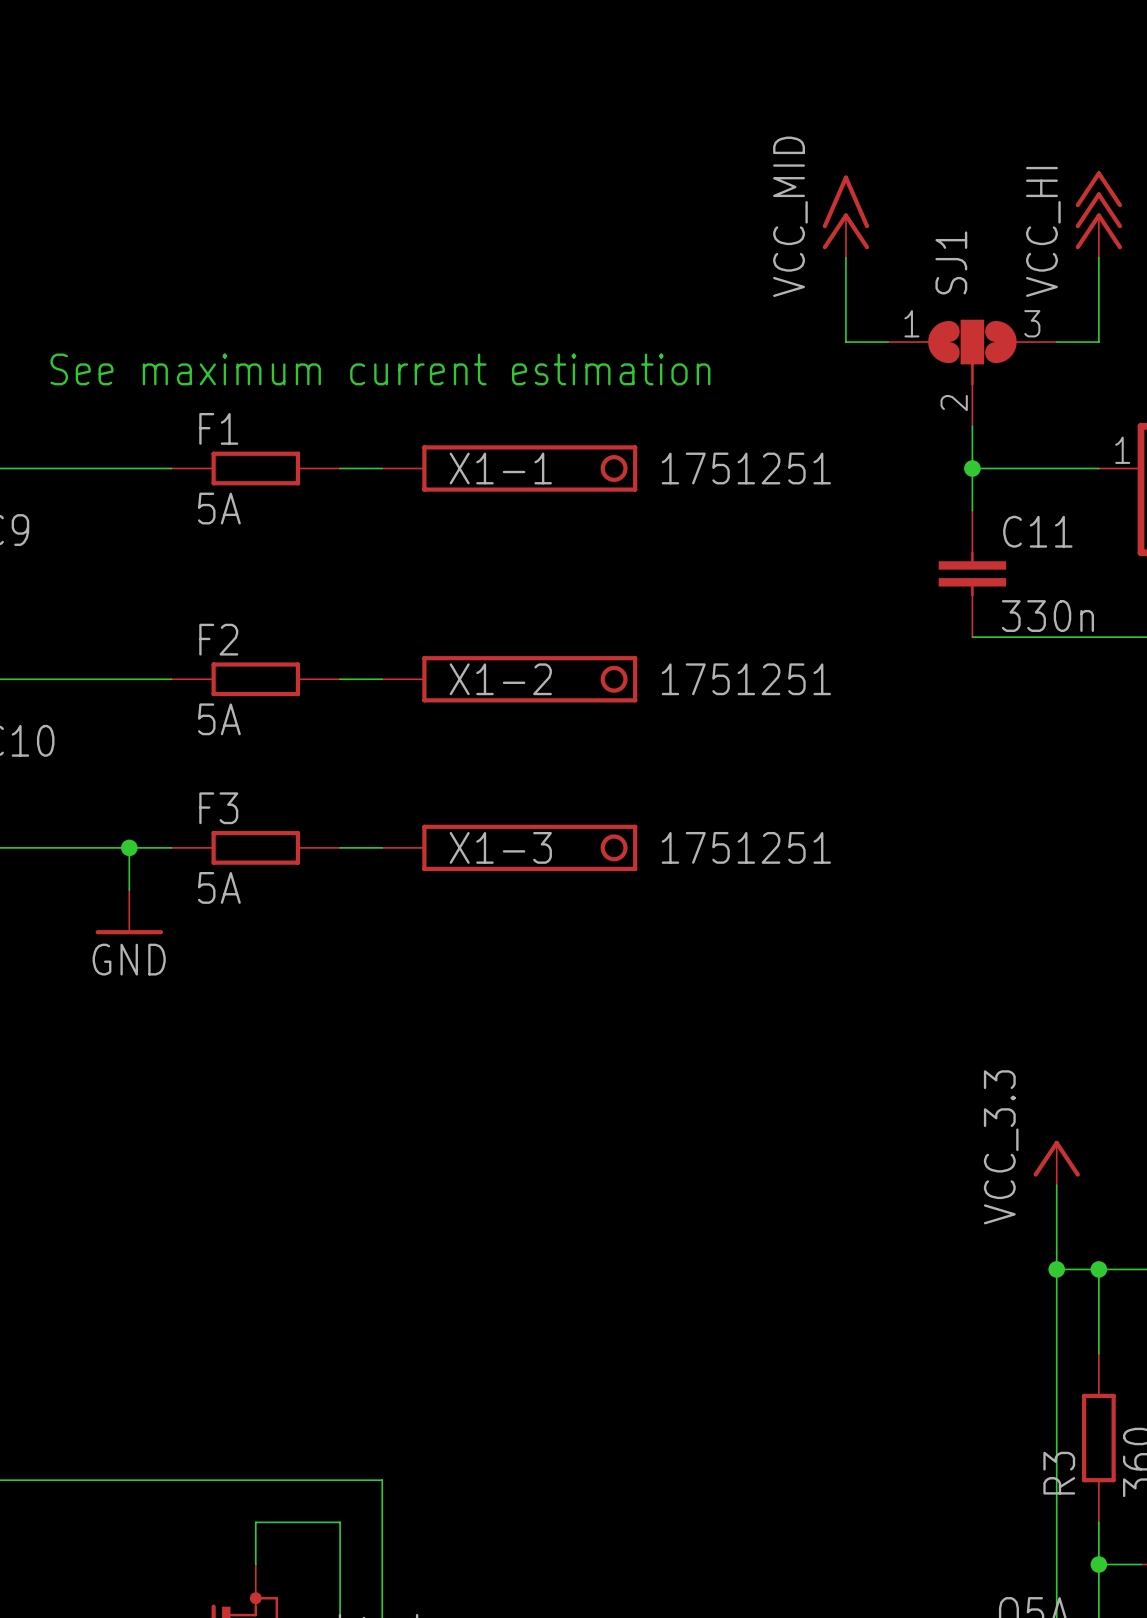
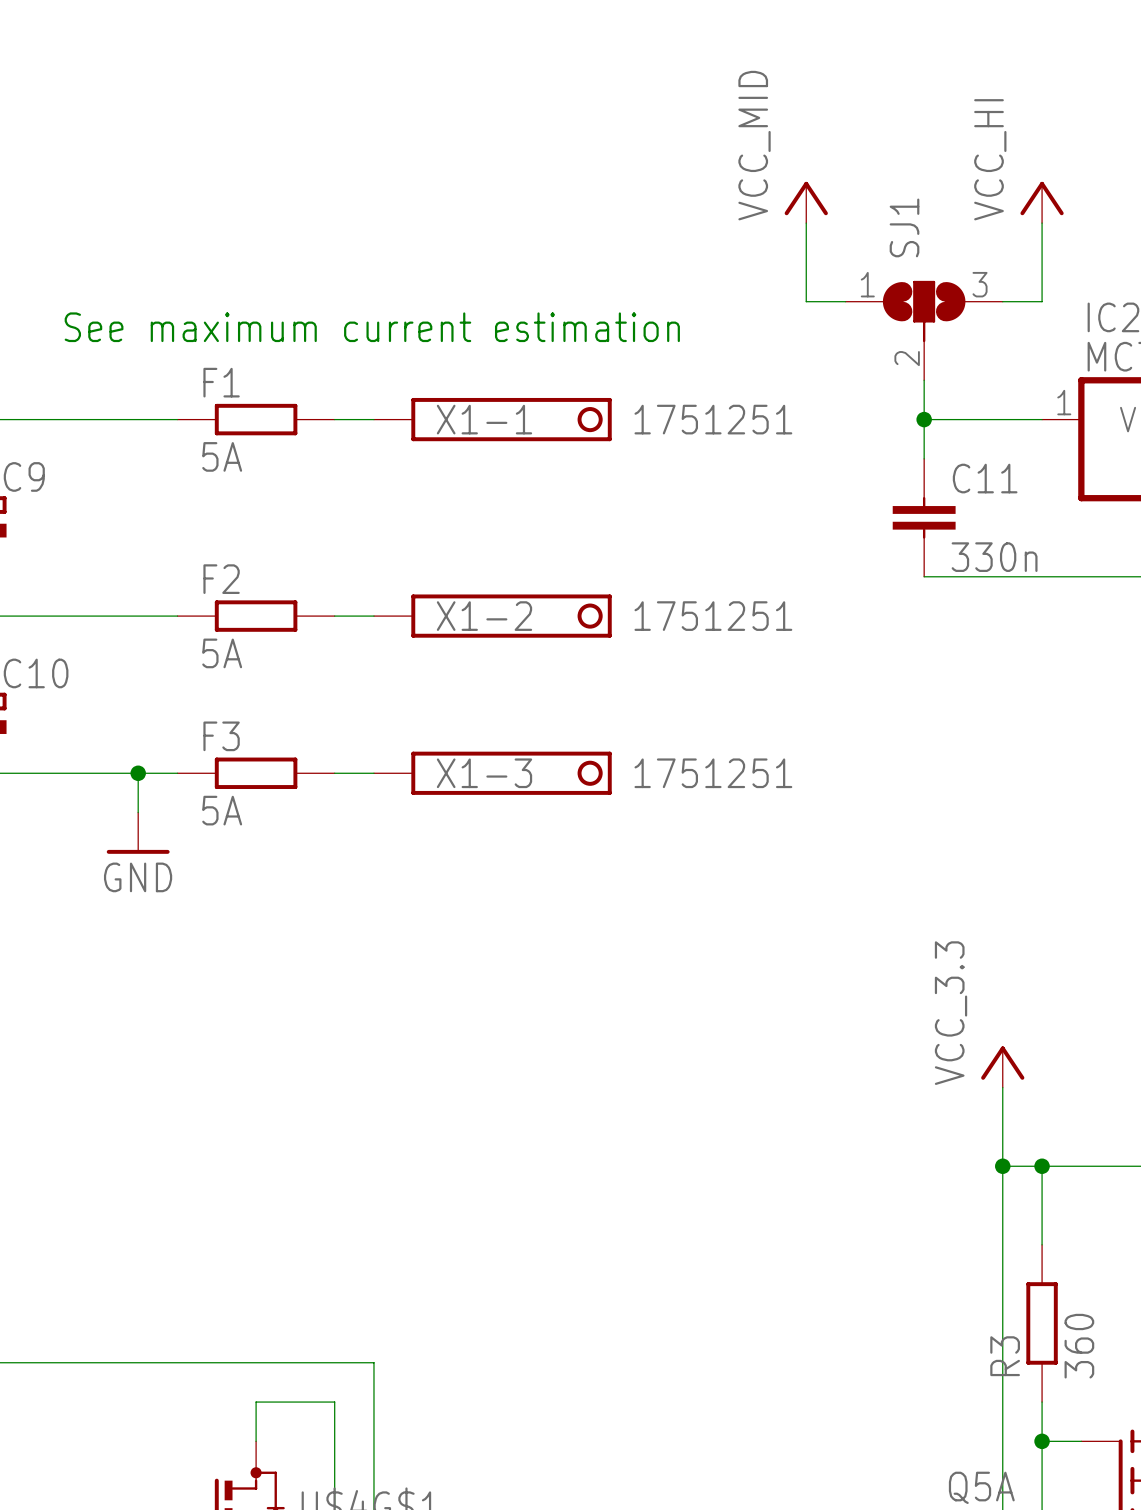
power symbol: VCC_HI (1098, 214) -> none
power symbol: VCC_MID (845, 216) -> none
power symbol: none -> VCC_MID (806, 202)
power symbol: none -> VCC_HI (1042, 202)
power symbol text position: VCC_3.3 (1001, 1147) -> VCC_3.3 (951, 1013)

